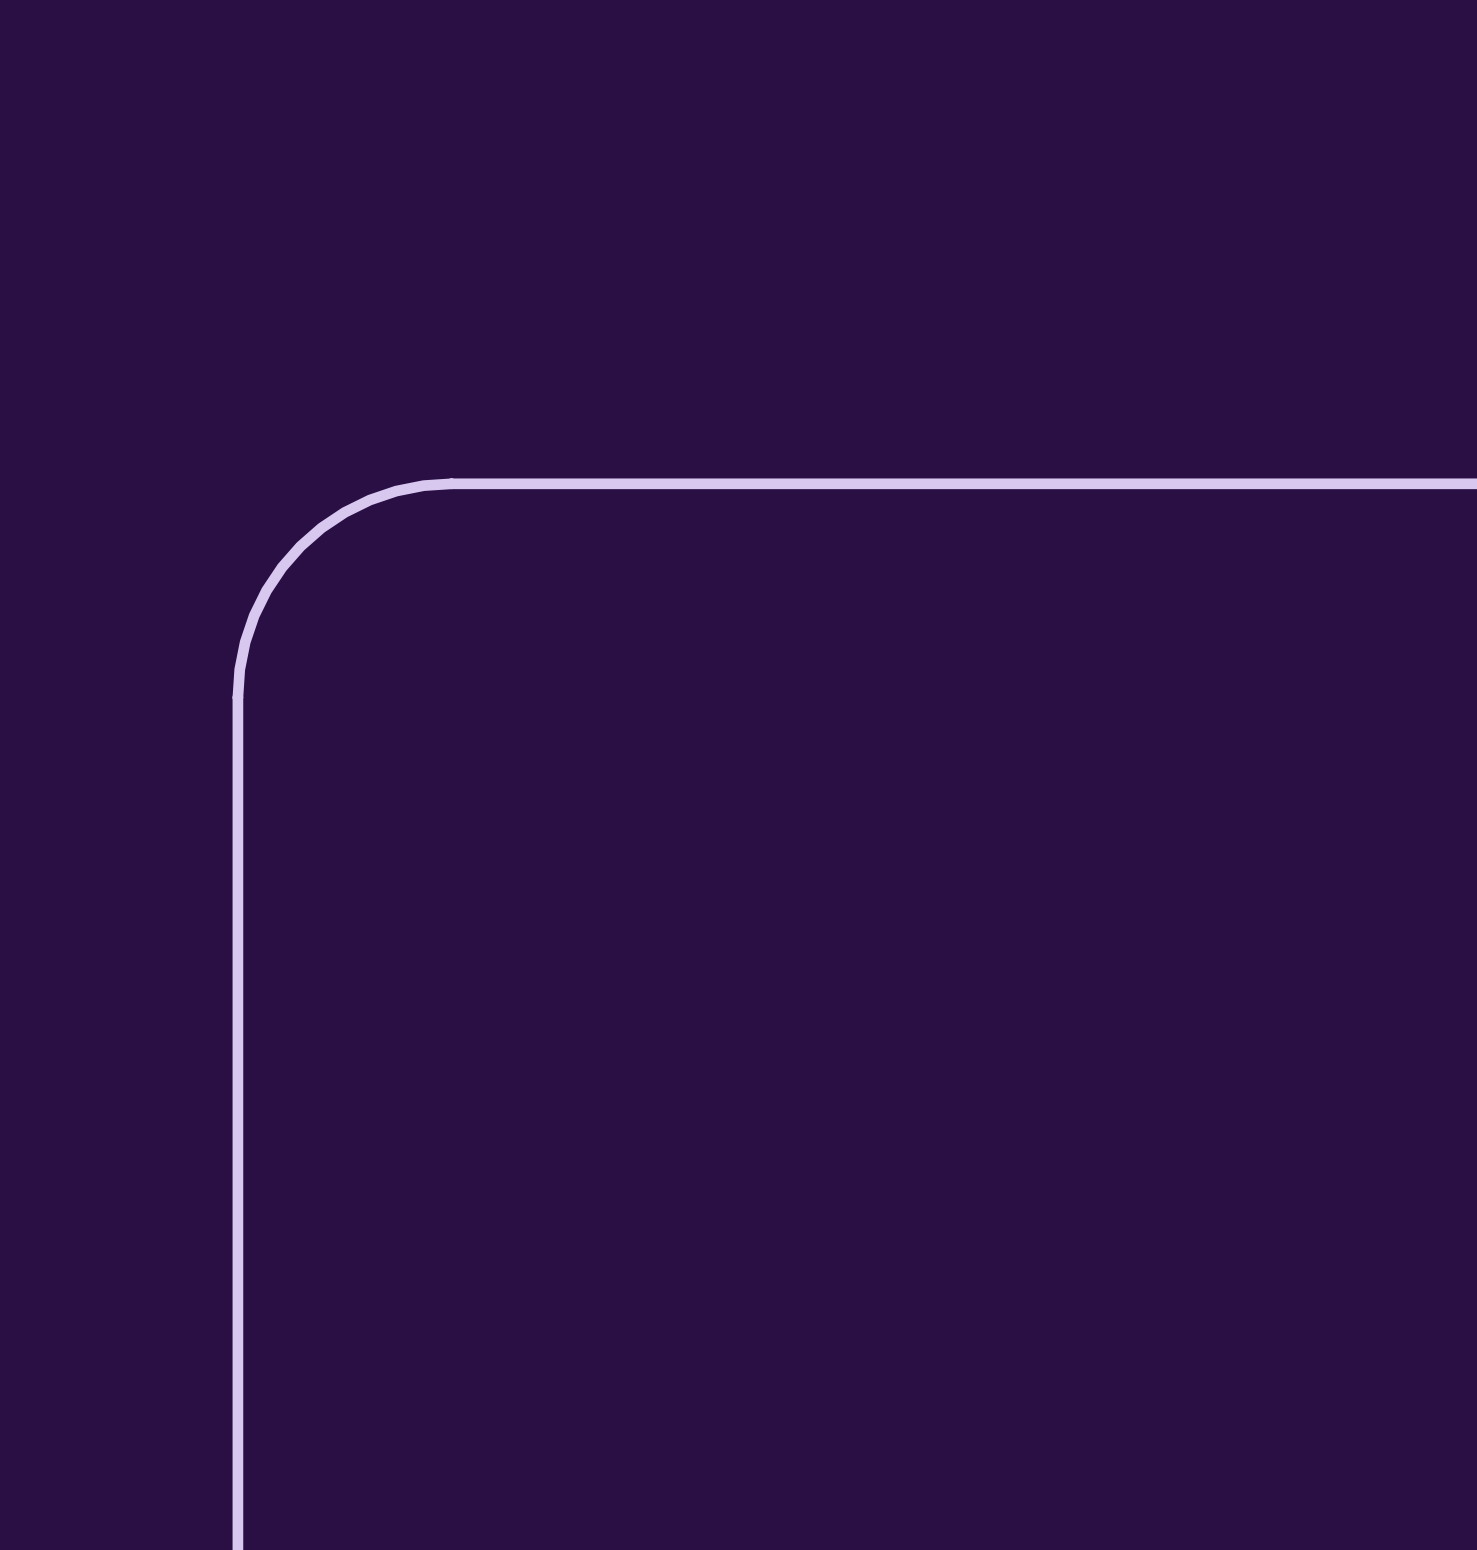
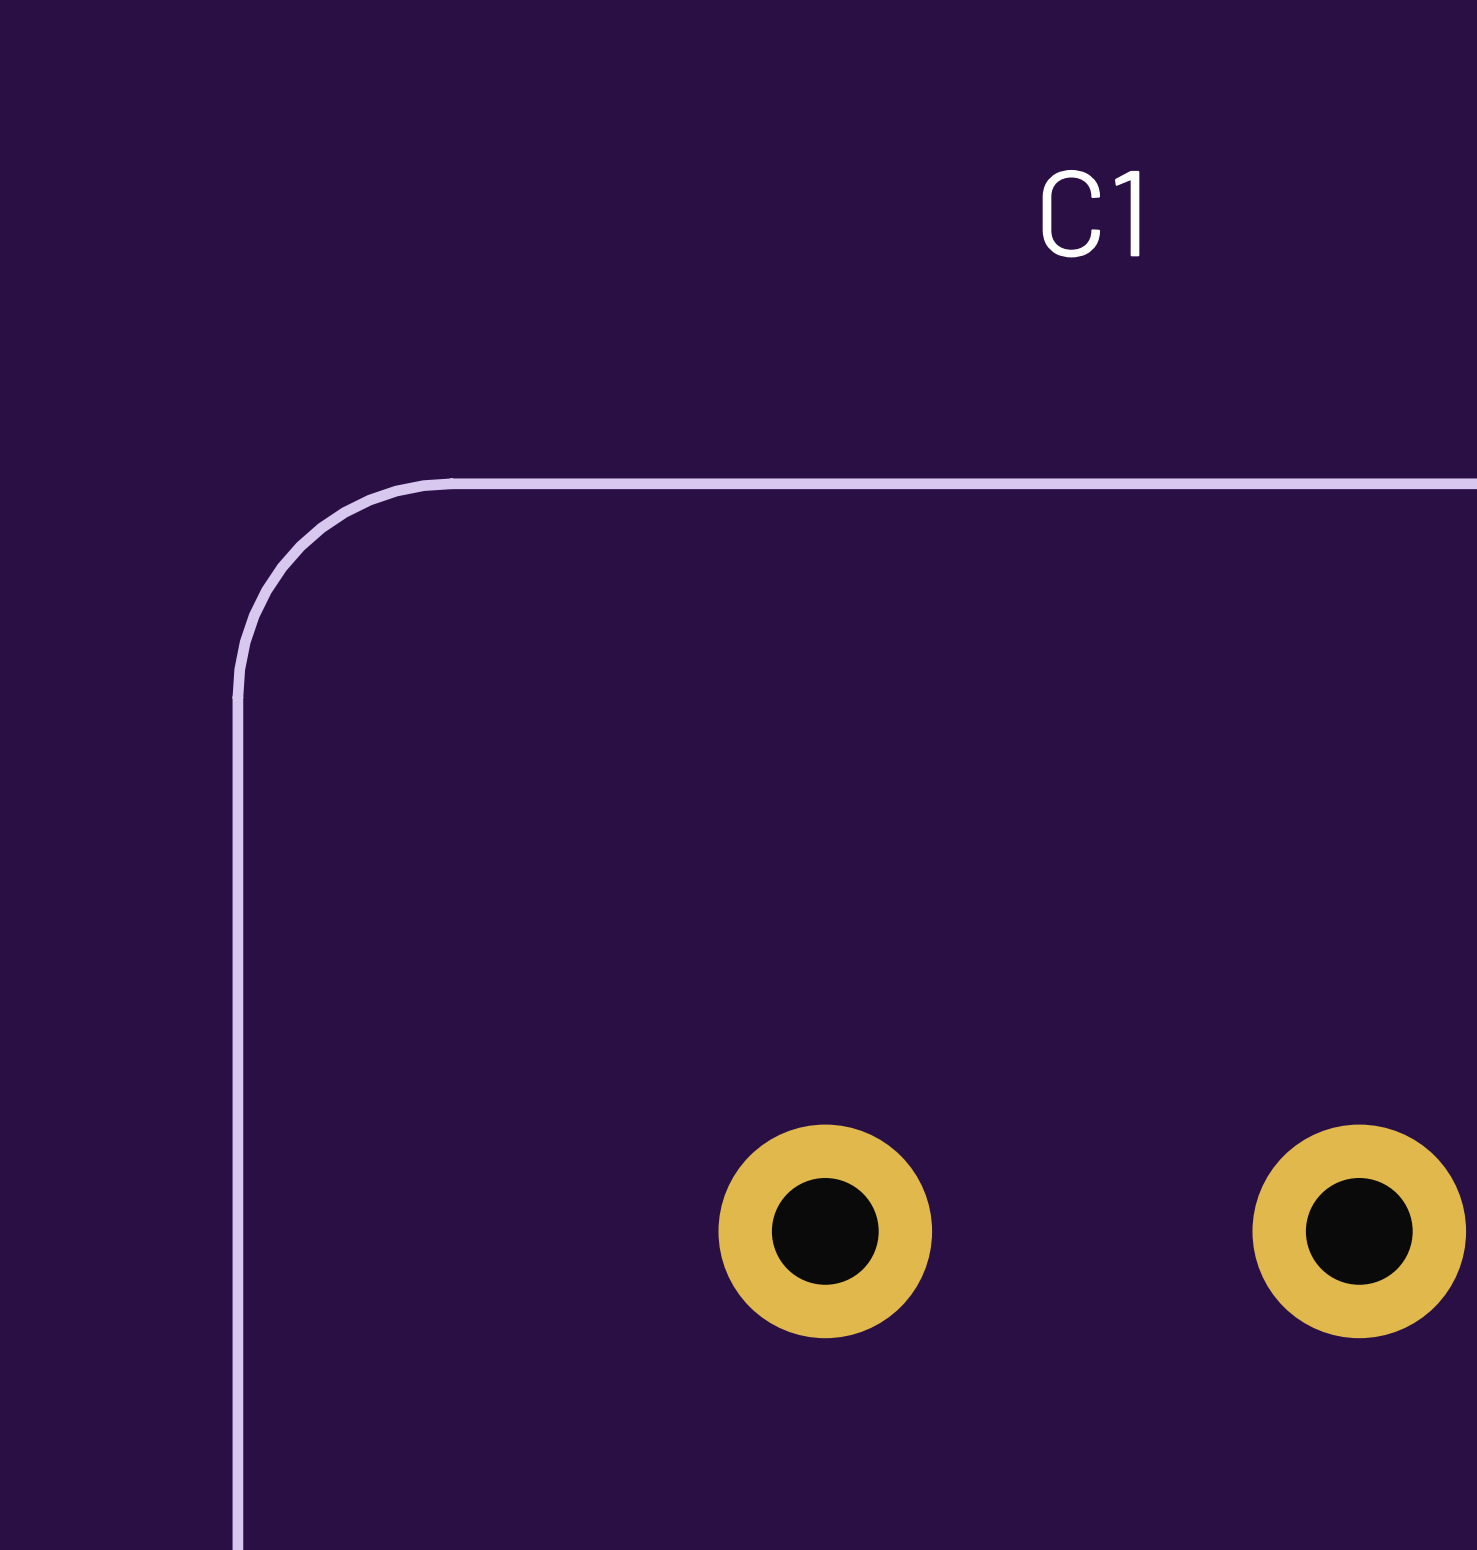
C1: none -> (1092, 1231)

